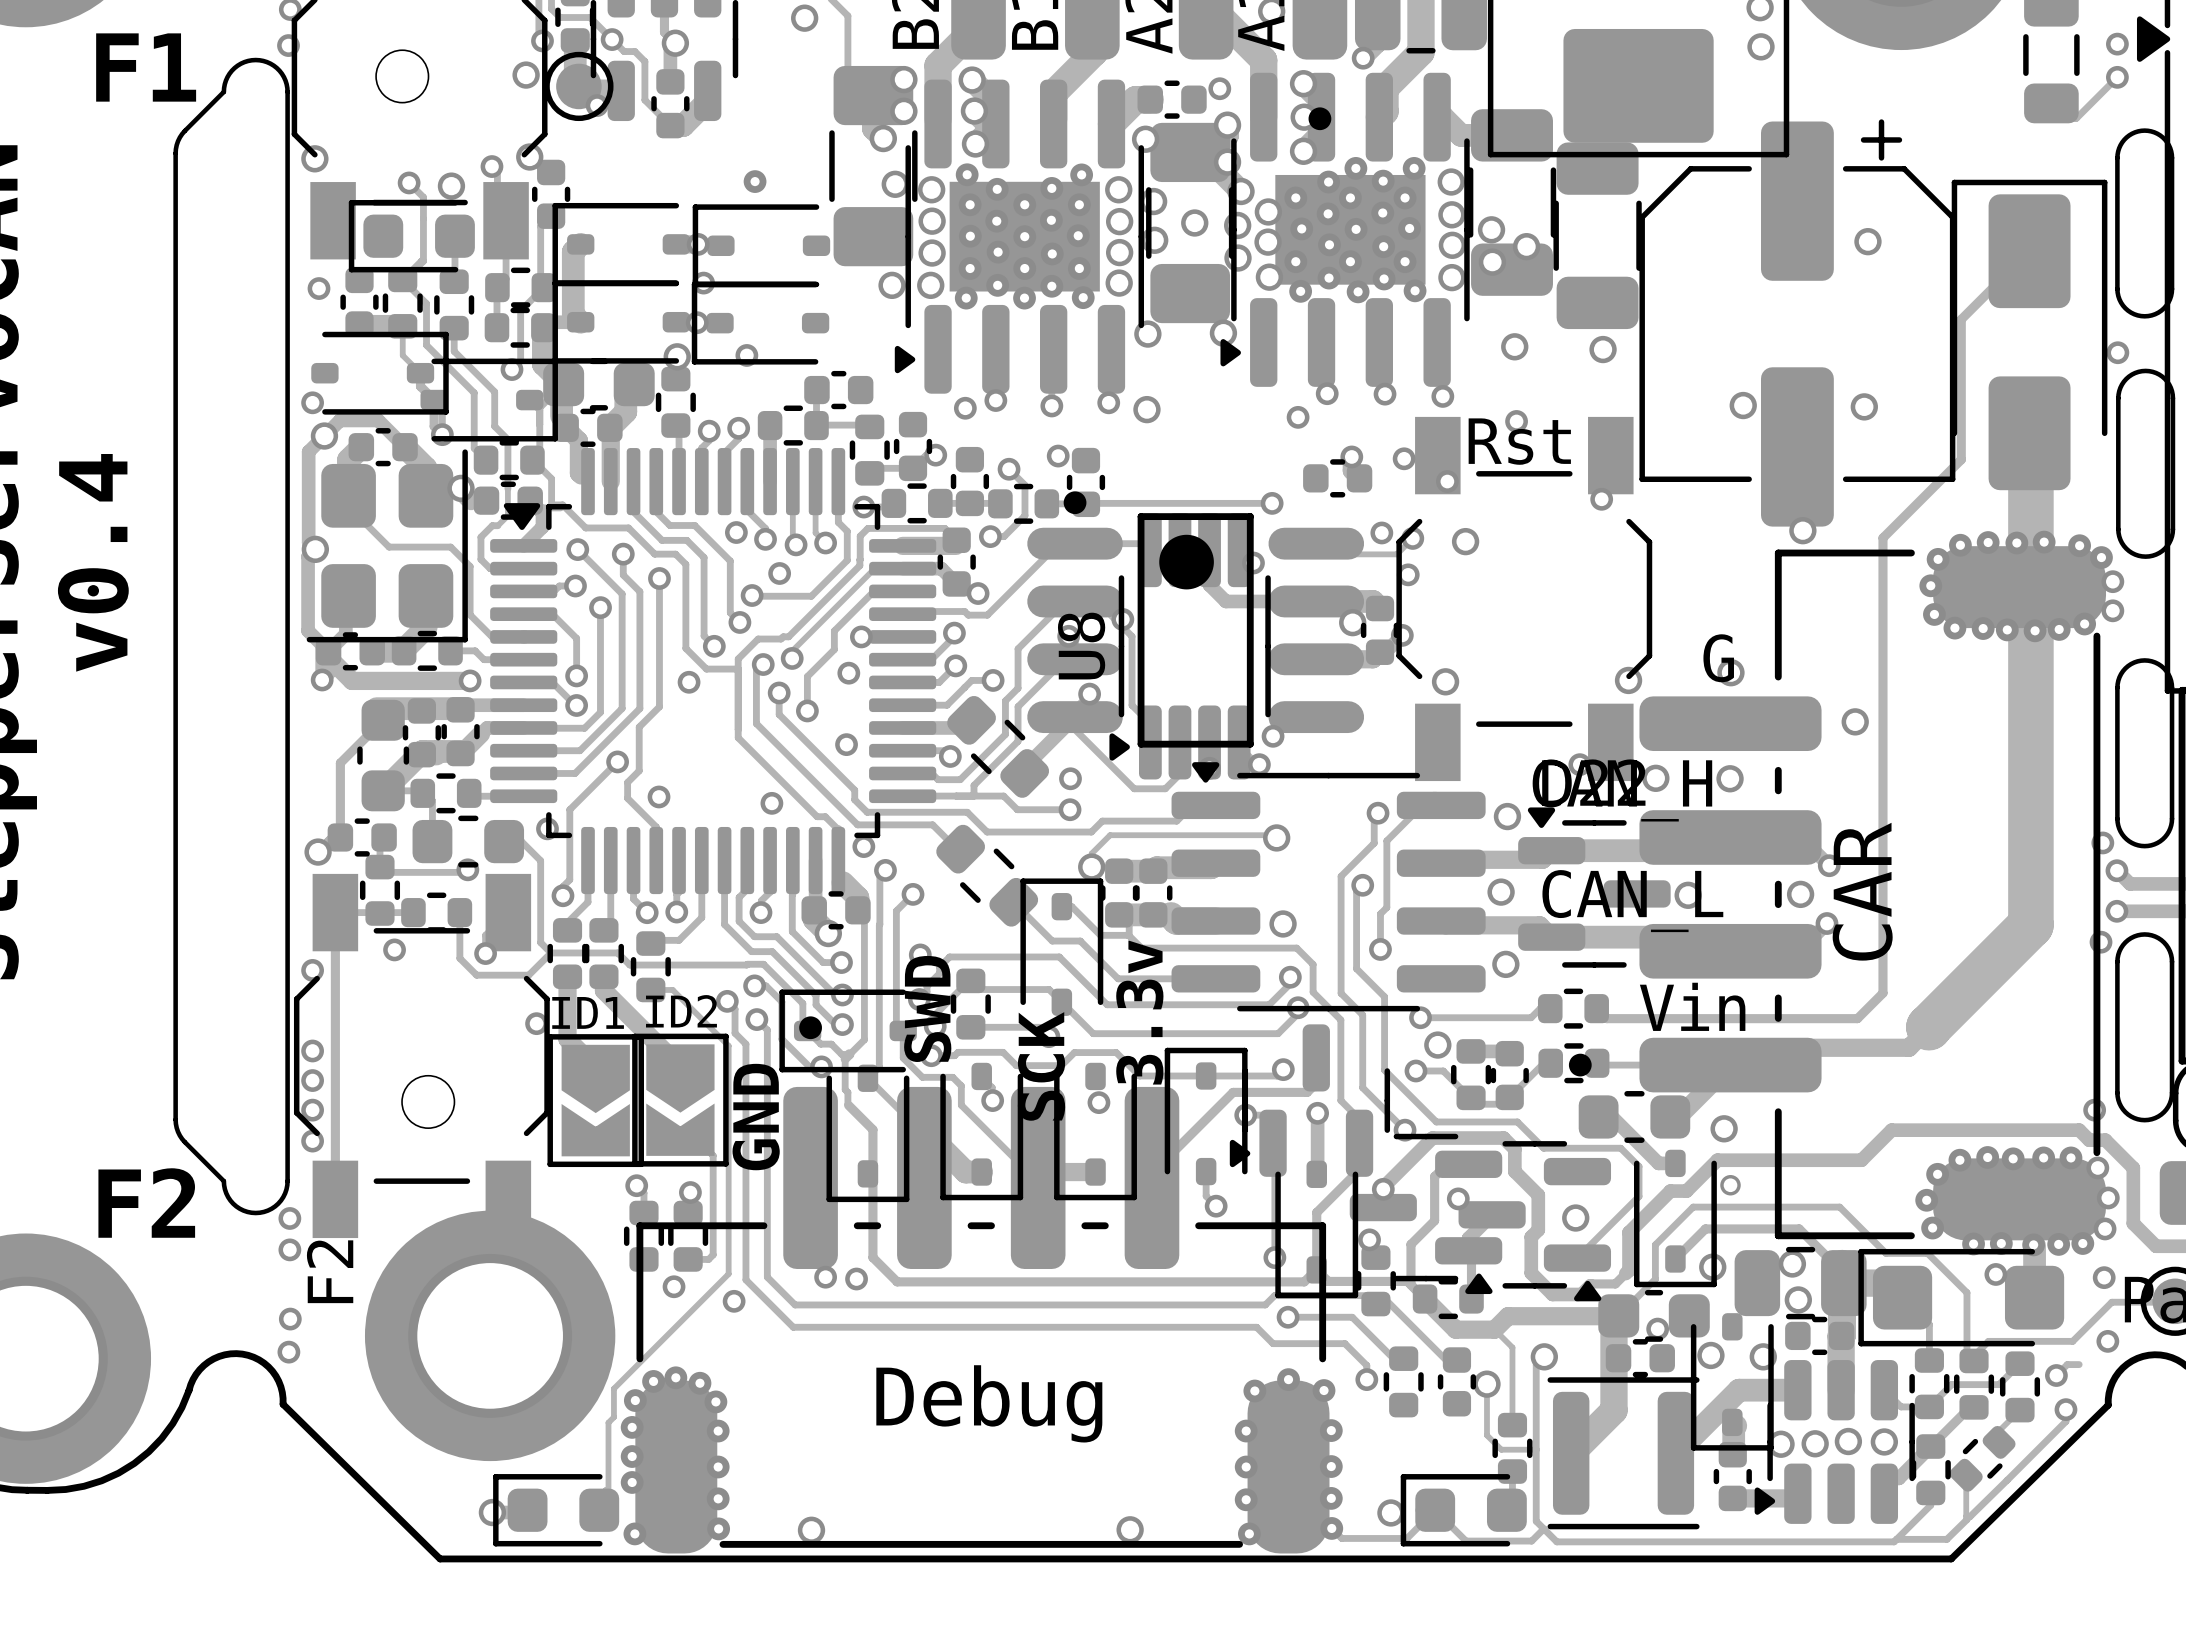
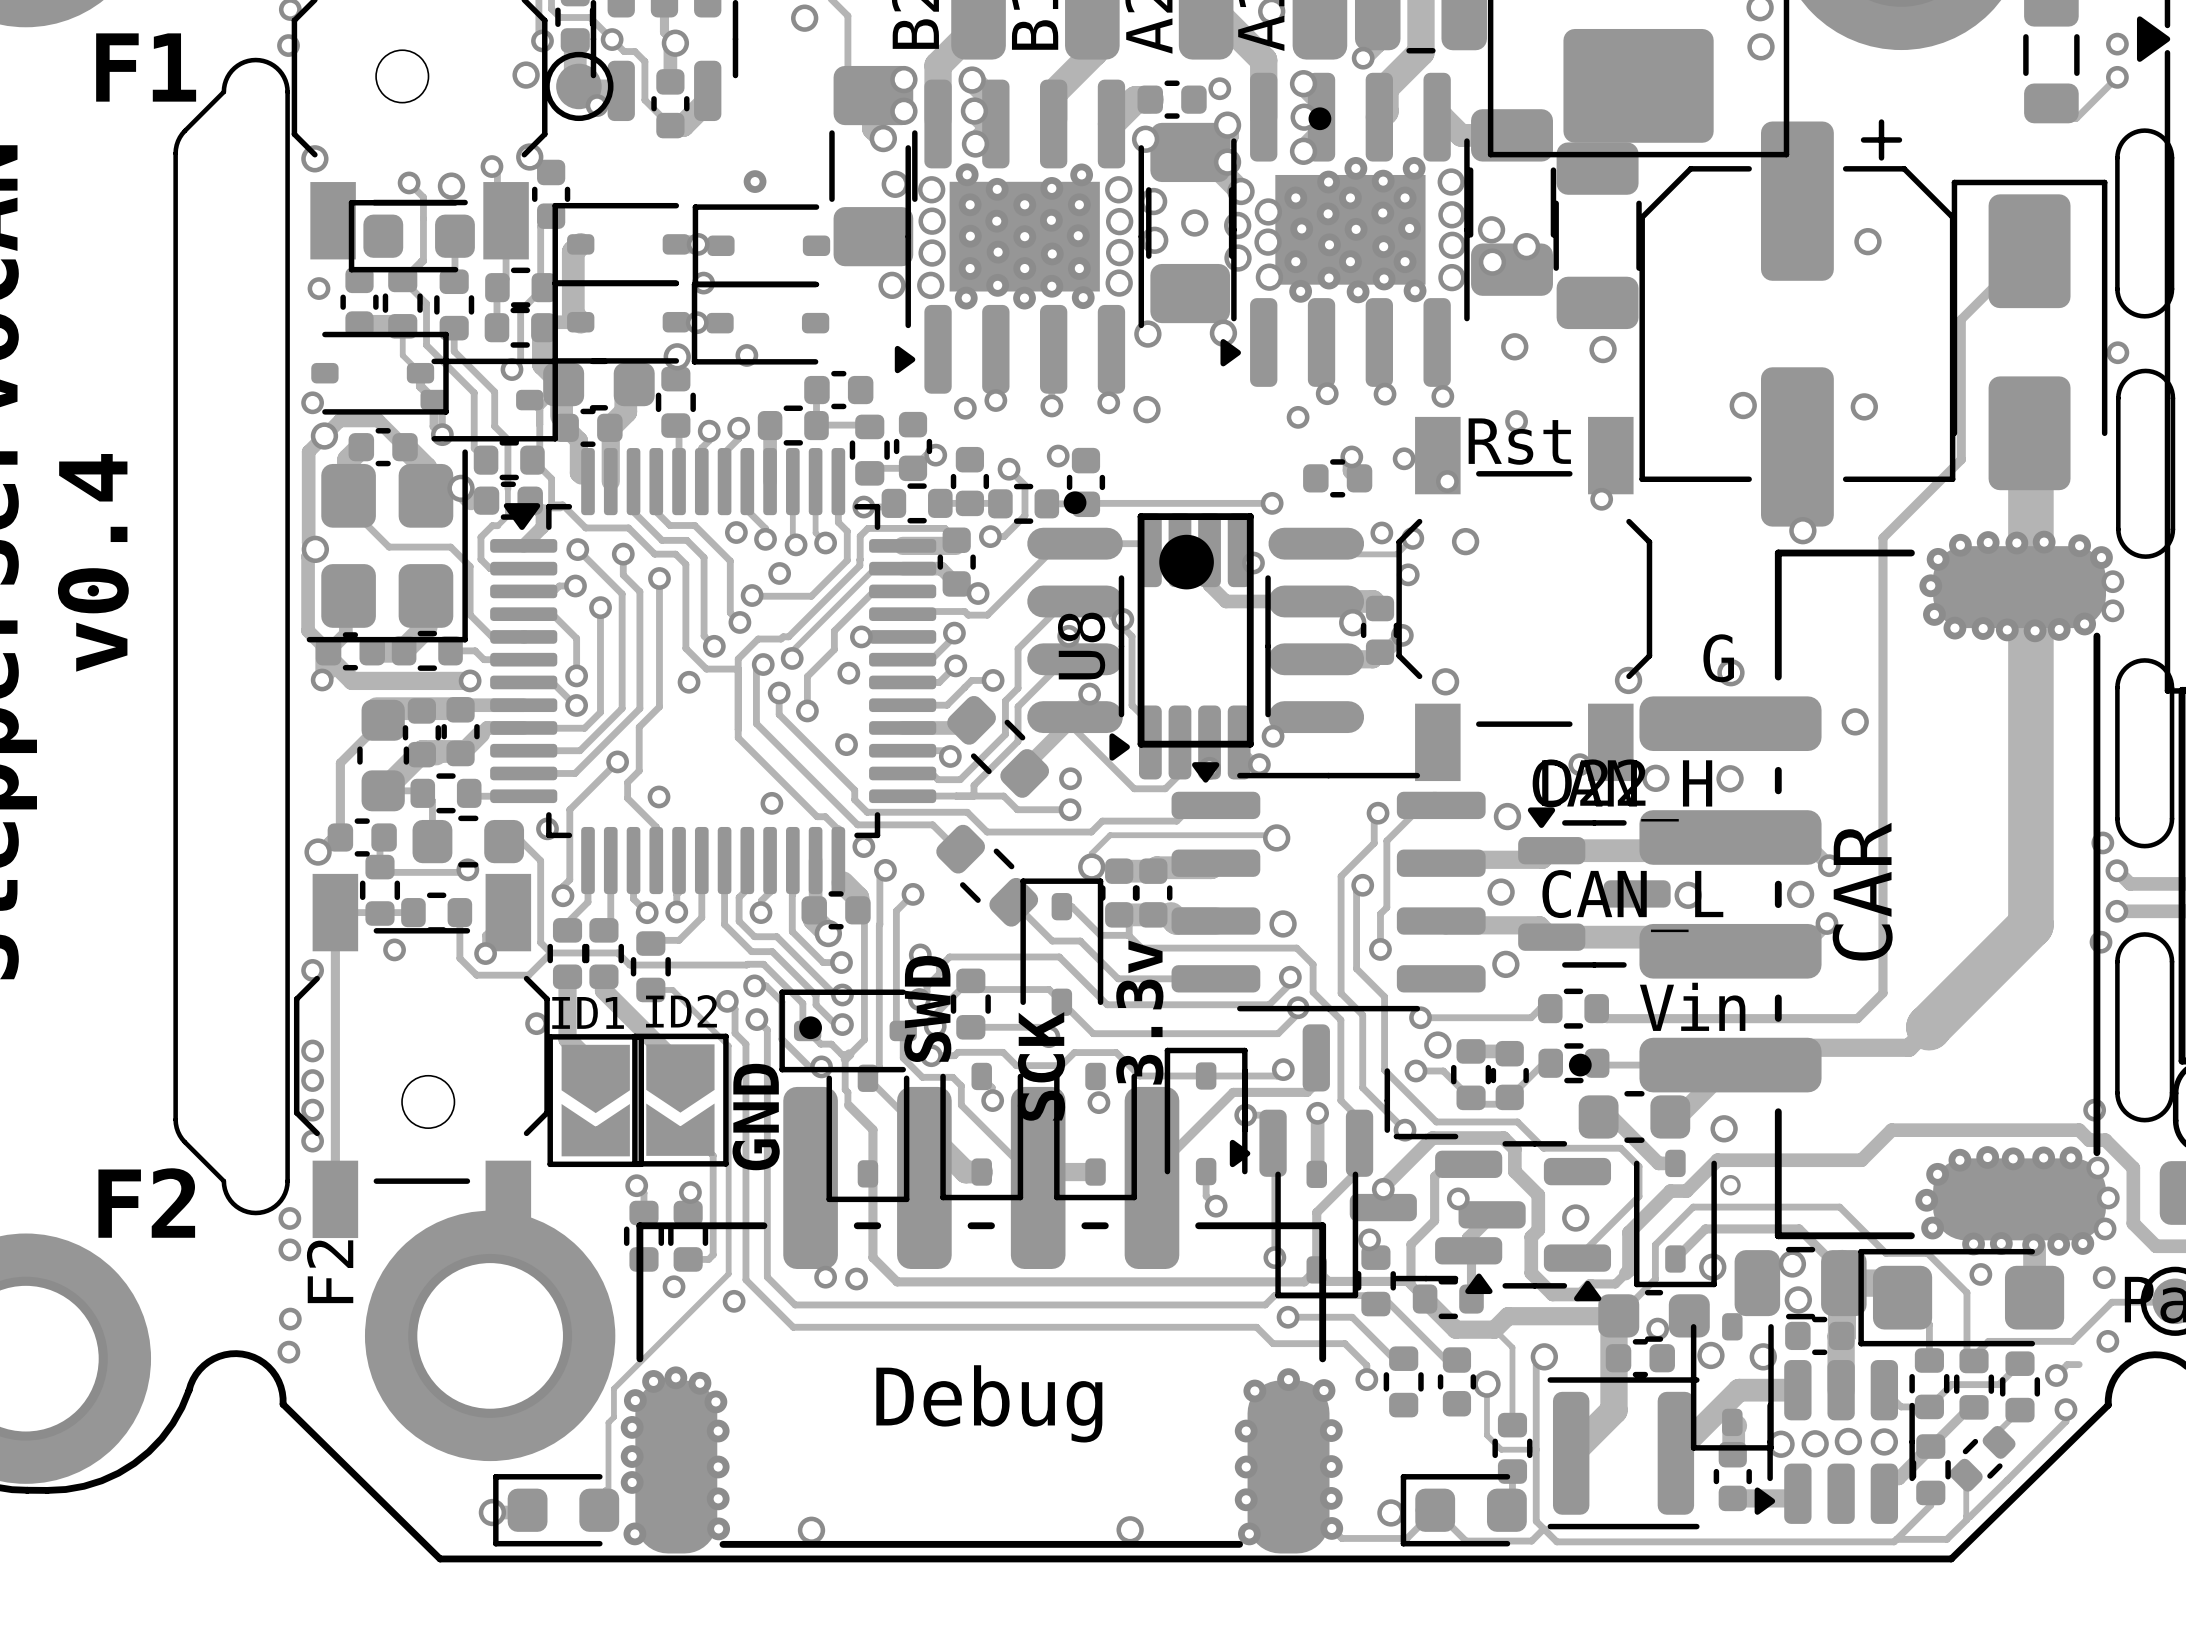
via position: (1995, 1274) -> (1980, 1274)

